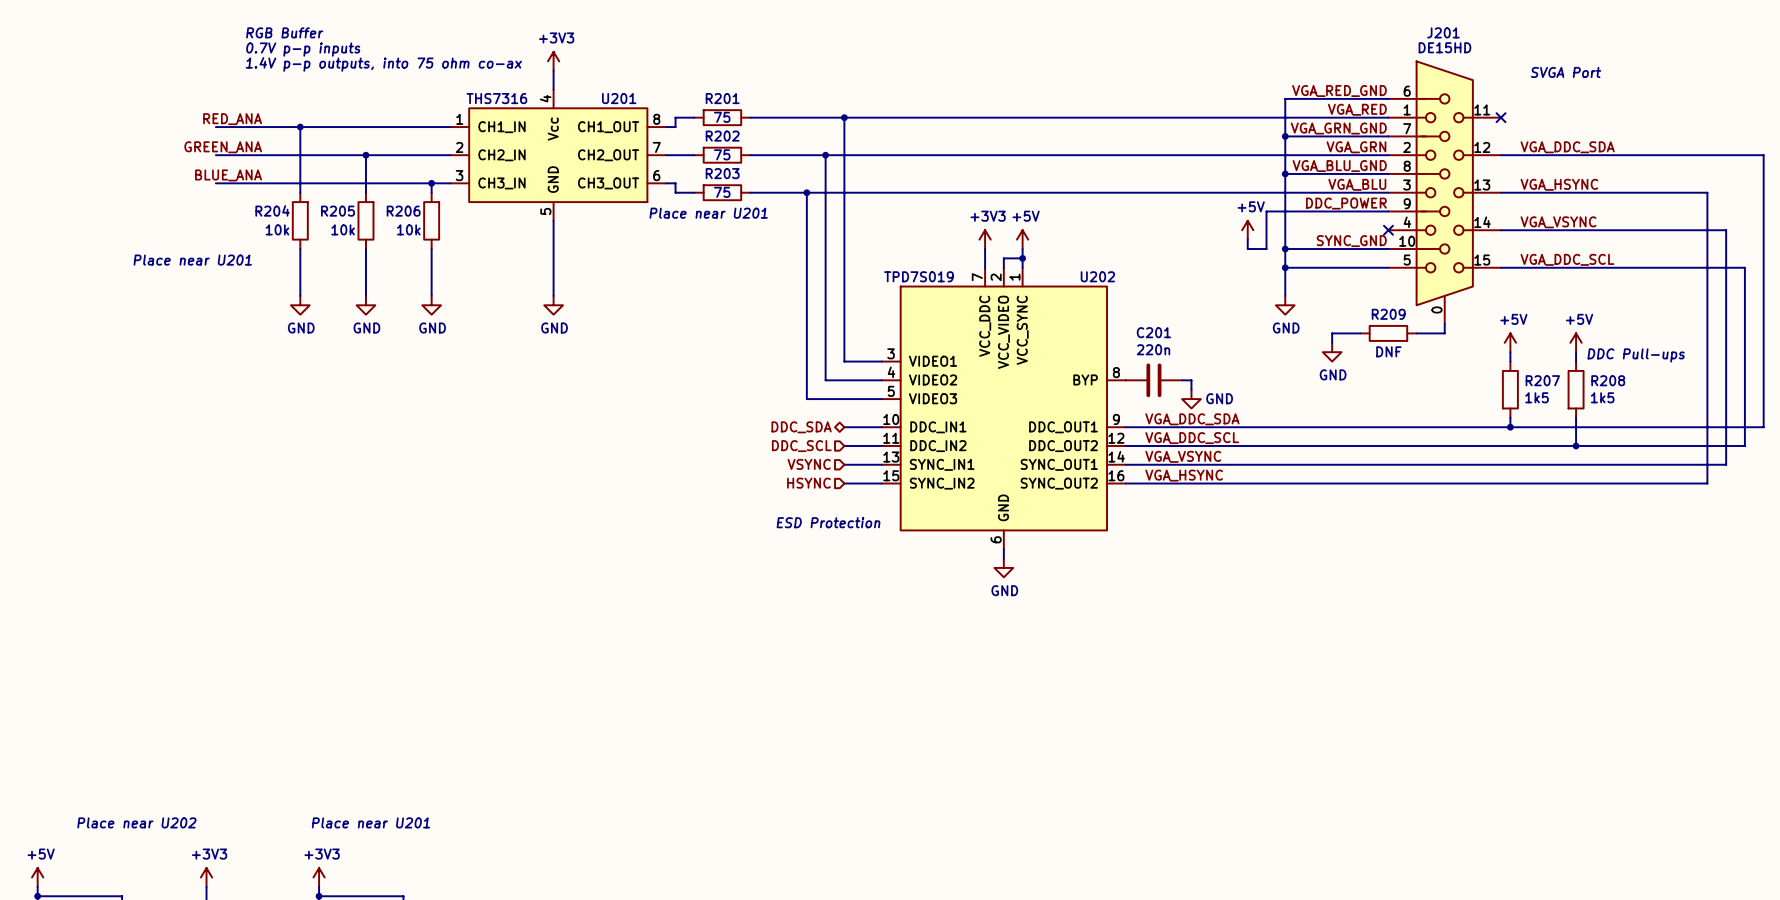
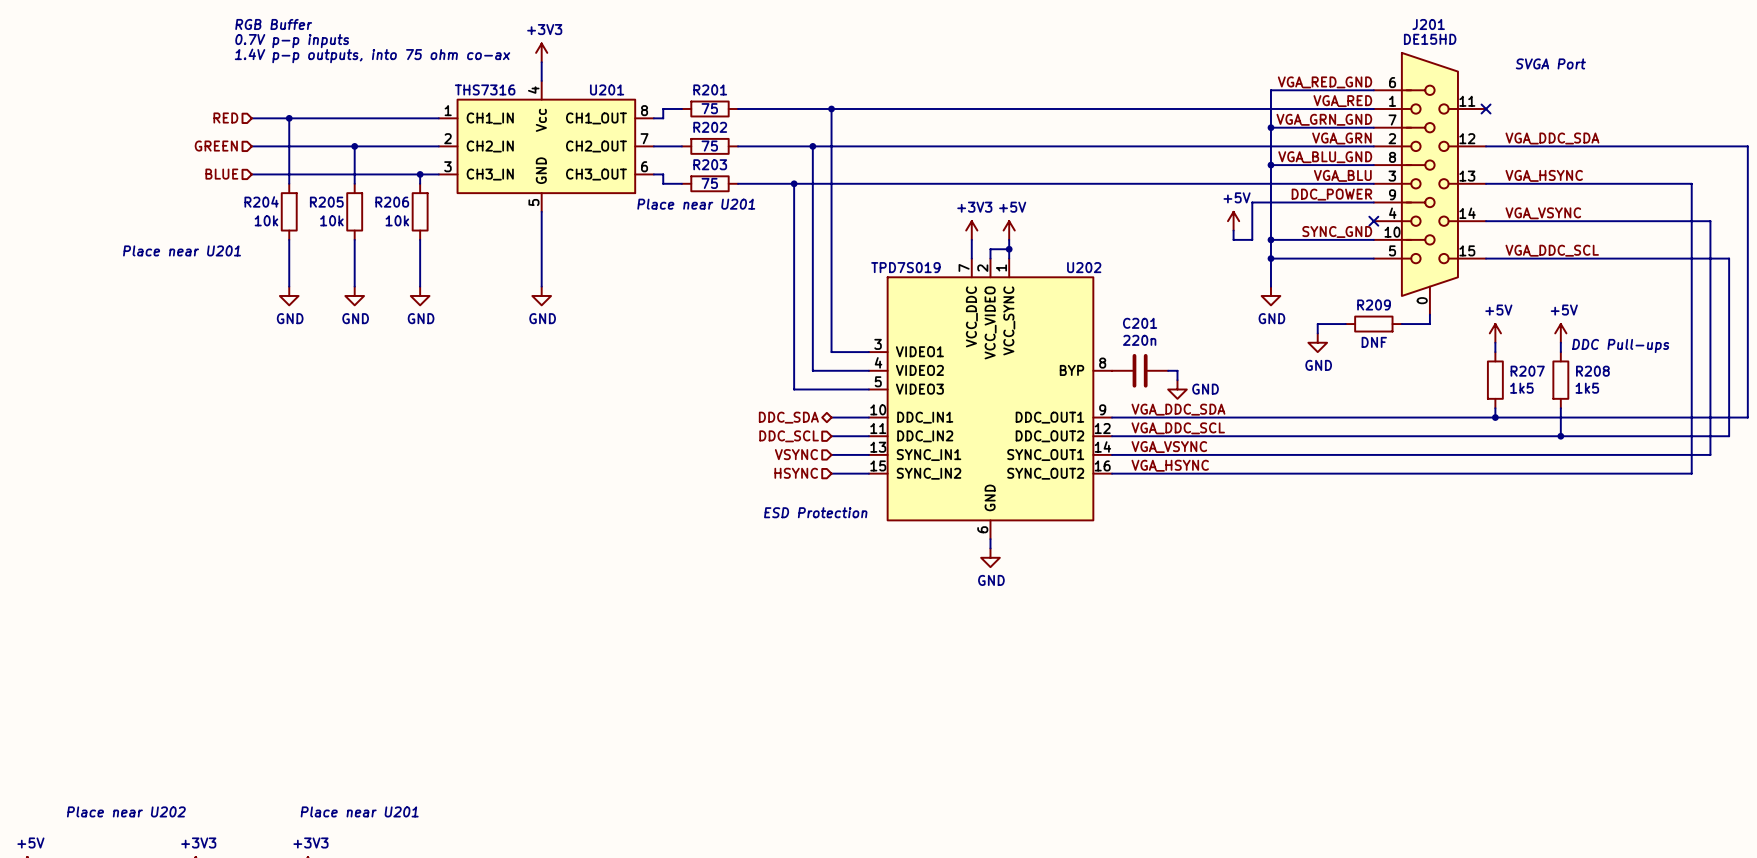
label: RED_ANA (232, 119) -> none
hierarchical label: none -> RED (225, 117)
wire: (215, 127) (262, 127) -> none
label: GREEN_ANA (223, 147) -> none
hierarchical label: none -> GREEN (216, 146)
label: BLUE_ANA (228, 175) -> none
hierarchical label: none -> BLUE (221, 174)
wire: (215, 183) (262, 183) -> none

